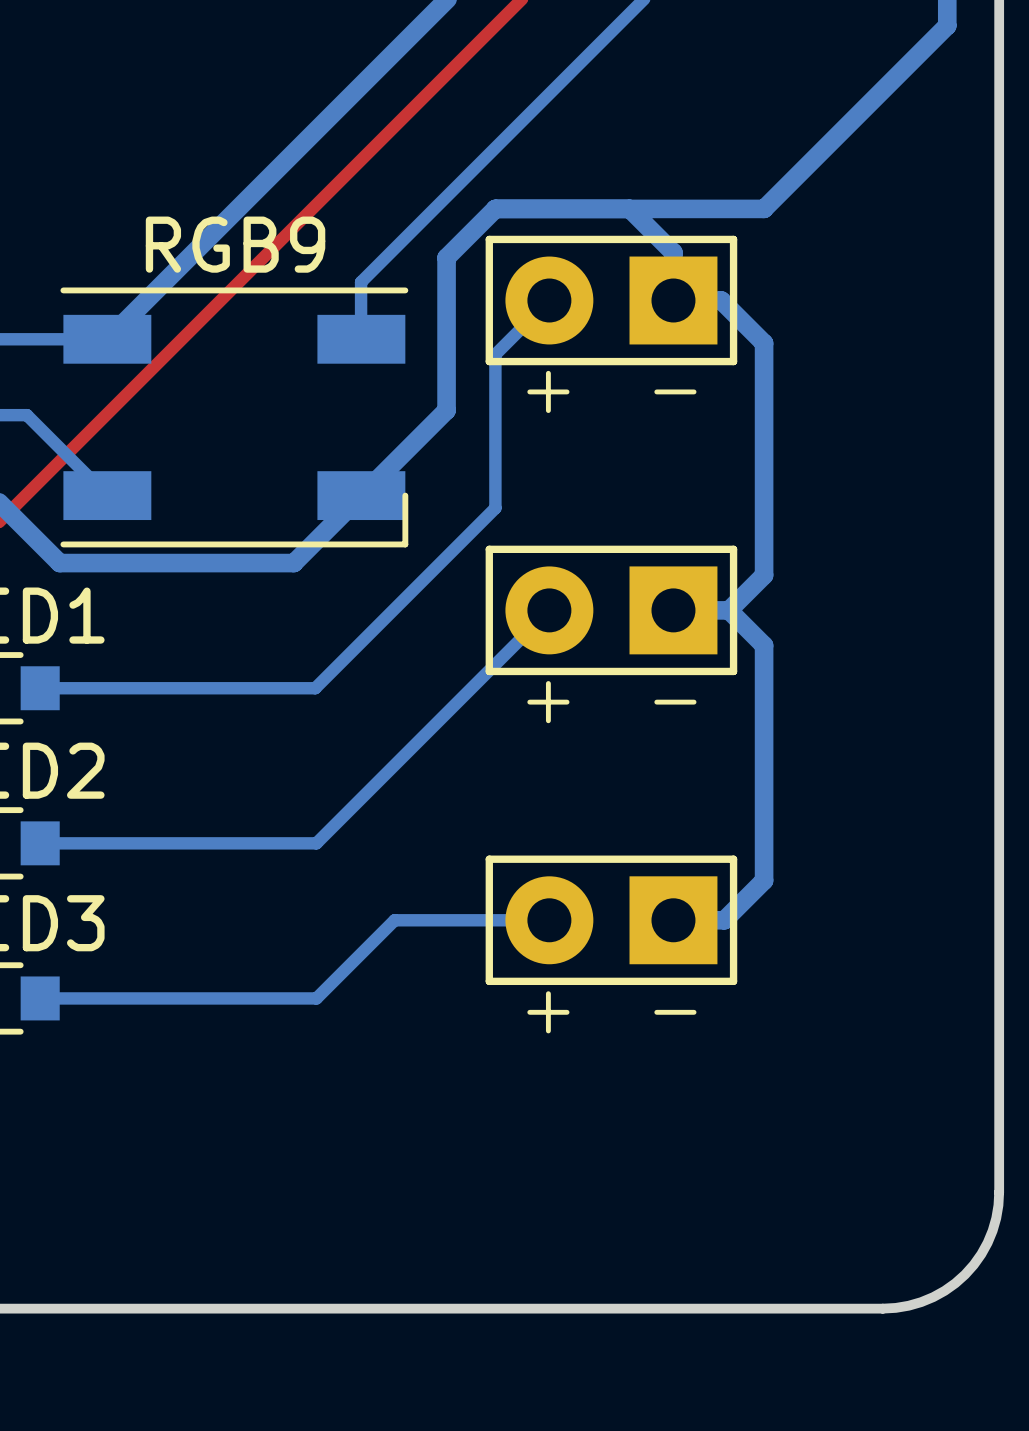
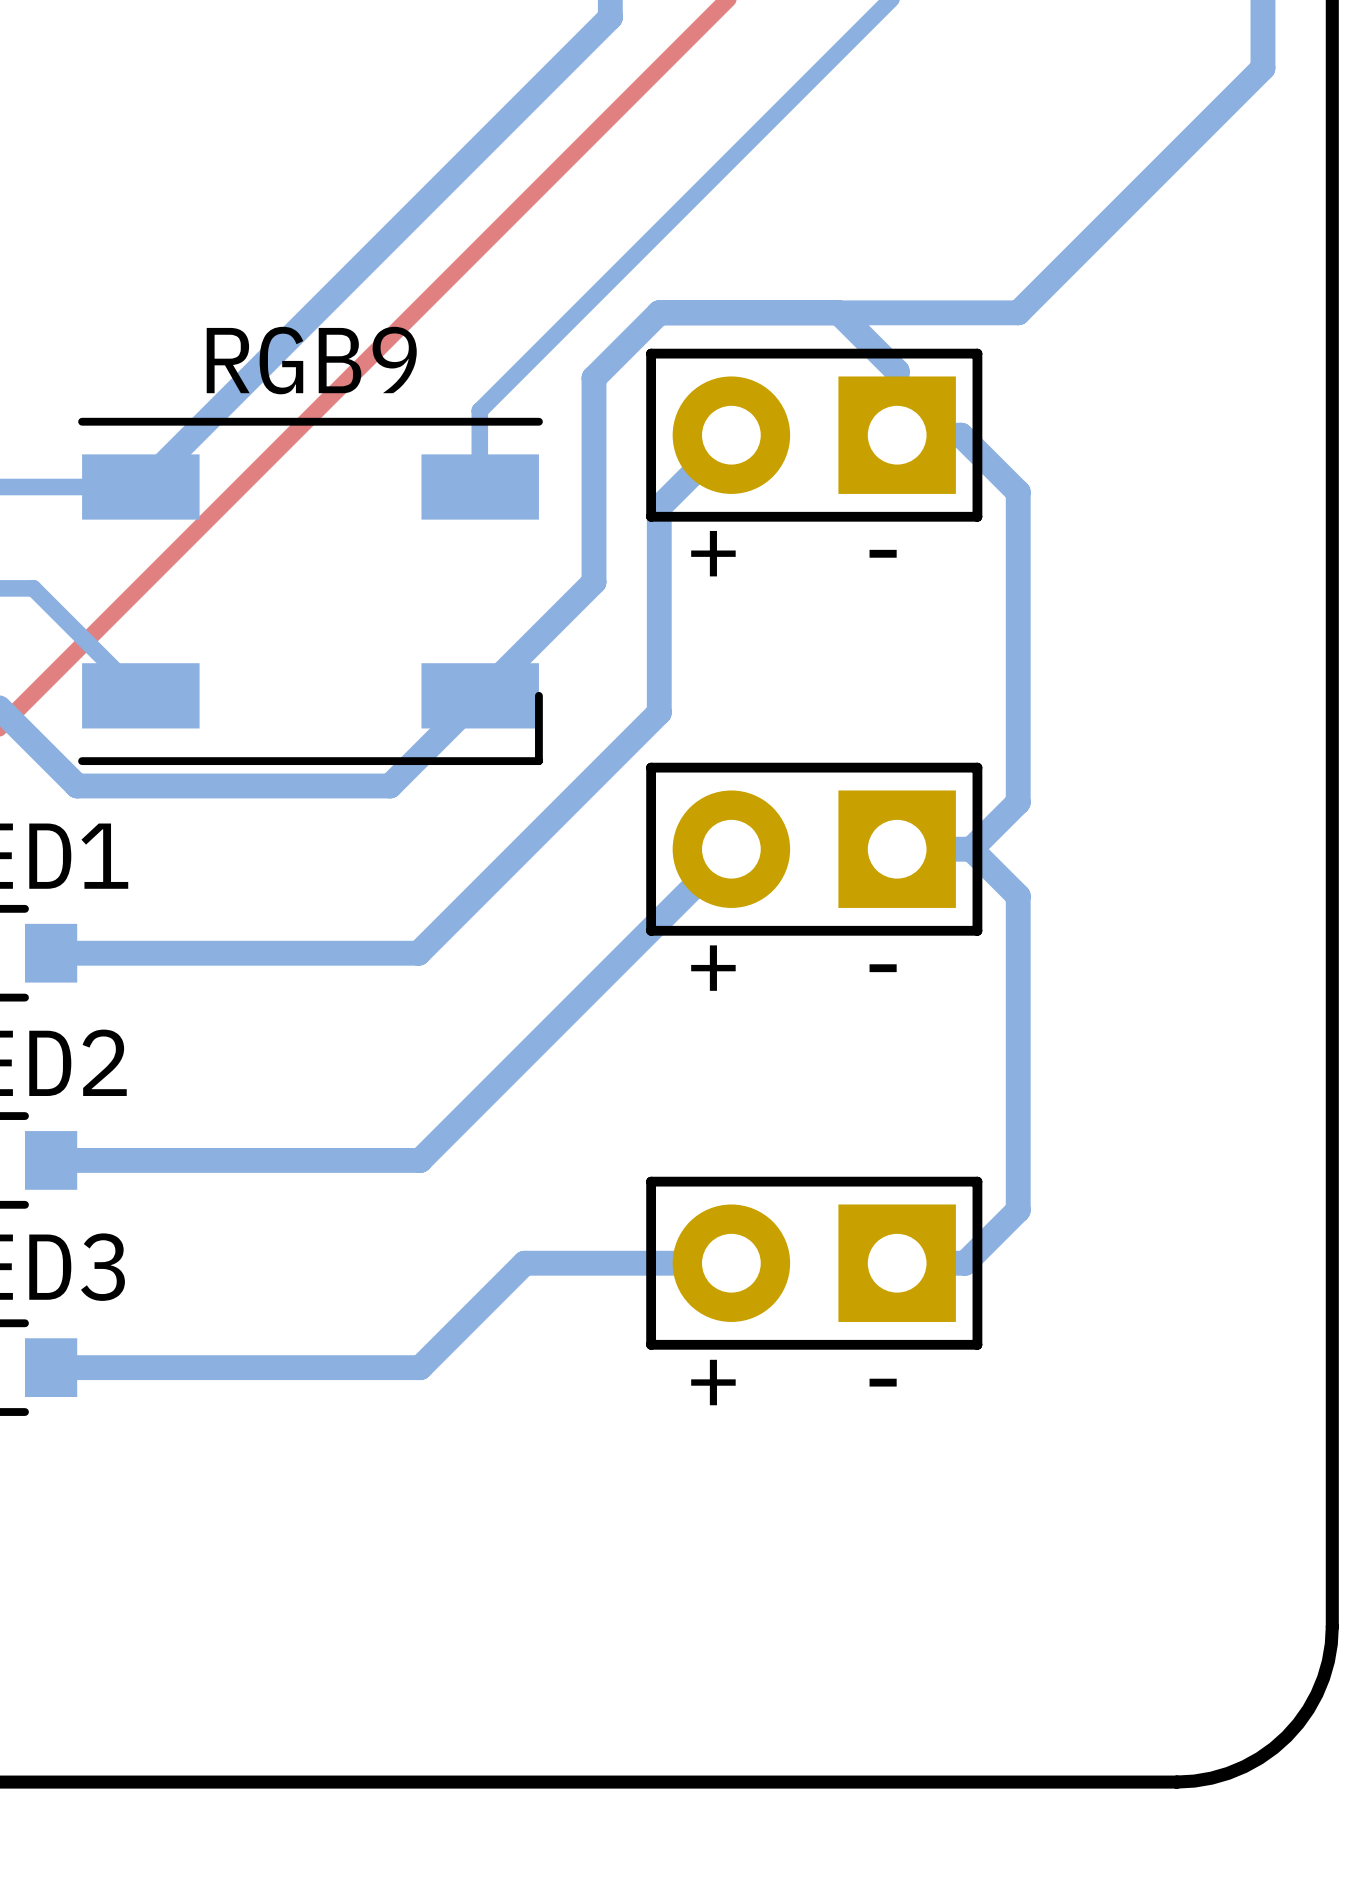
bottom track width: thin (549, 300) (495, 354) (495, 508) (315, 688) (40, 688) -> thick (731, 435) (659, 507) (659, 712) (418, 953) (51, 953)
bottom track width: thin (549, 610) (316, 843) (40, 843) -> thick (731, 849) (420, 1160) (51, 1160)
bottom track width: thin (549, 920) (394, 920) (316, 998) (40, 998) -> thick (731, 1263) (524, 1263) (420, 1367) (51, 1367)

